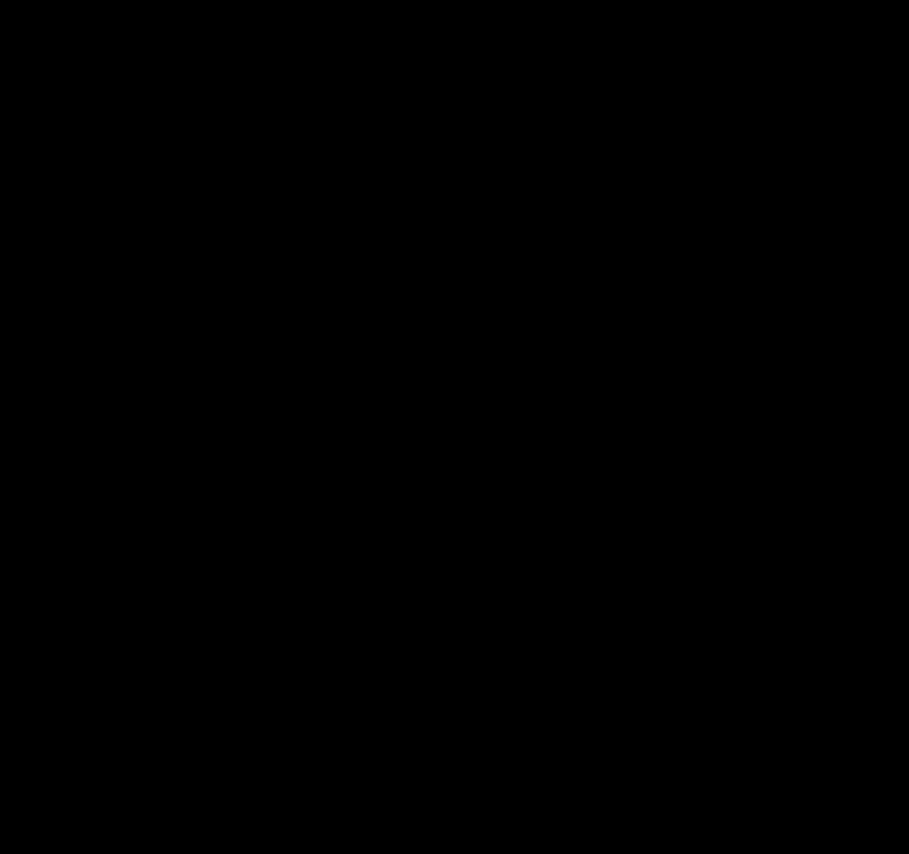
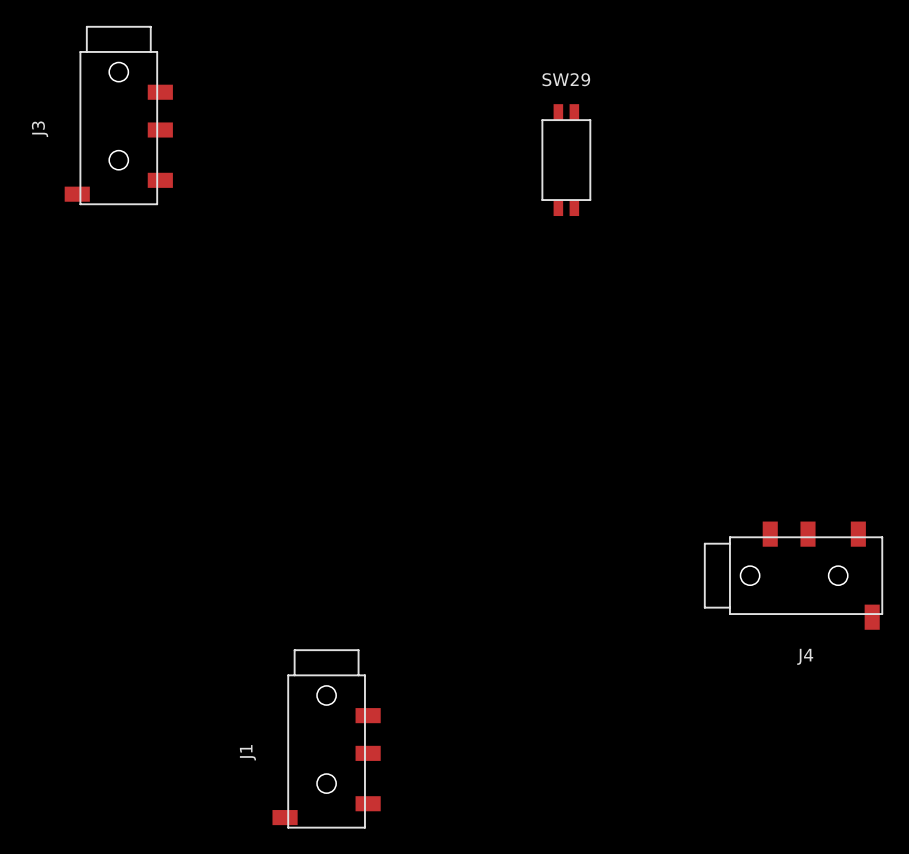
J3: none -> (118, 115)
SW29: none -> (566, 160)
J4: none -> (793, 575)
J1: none -> (326, 738)

